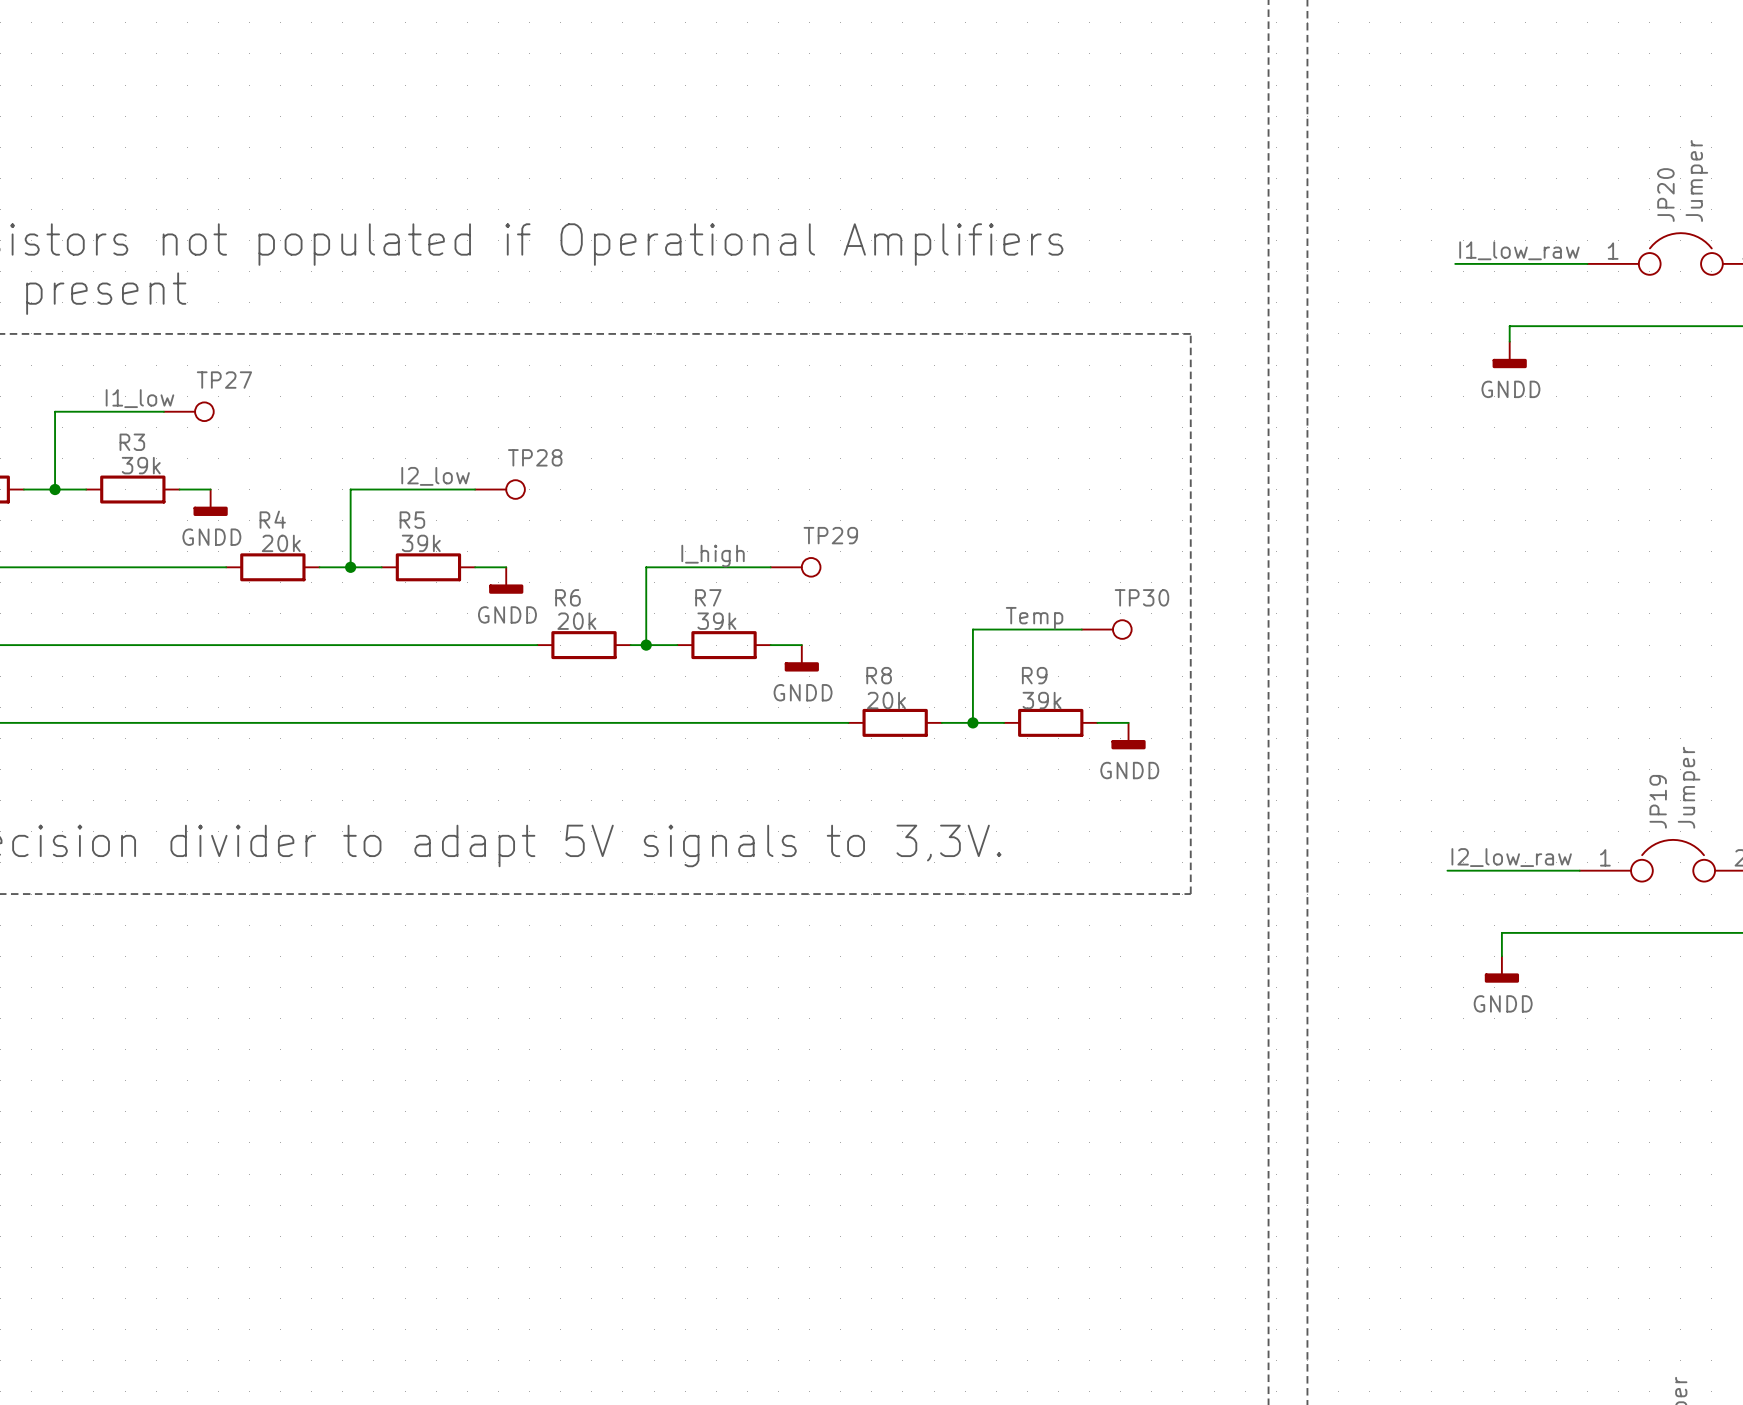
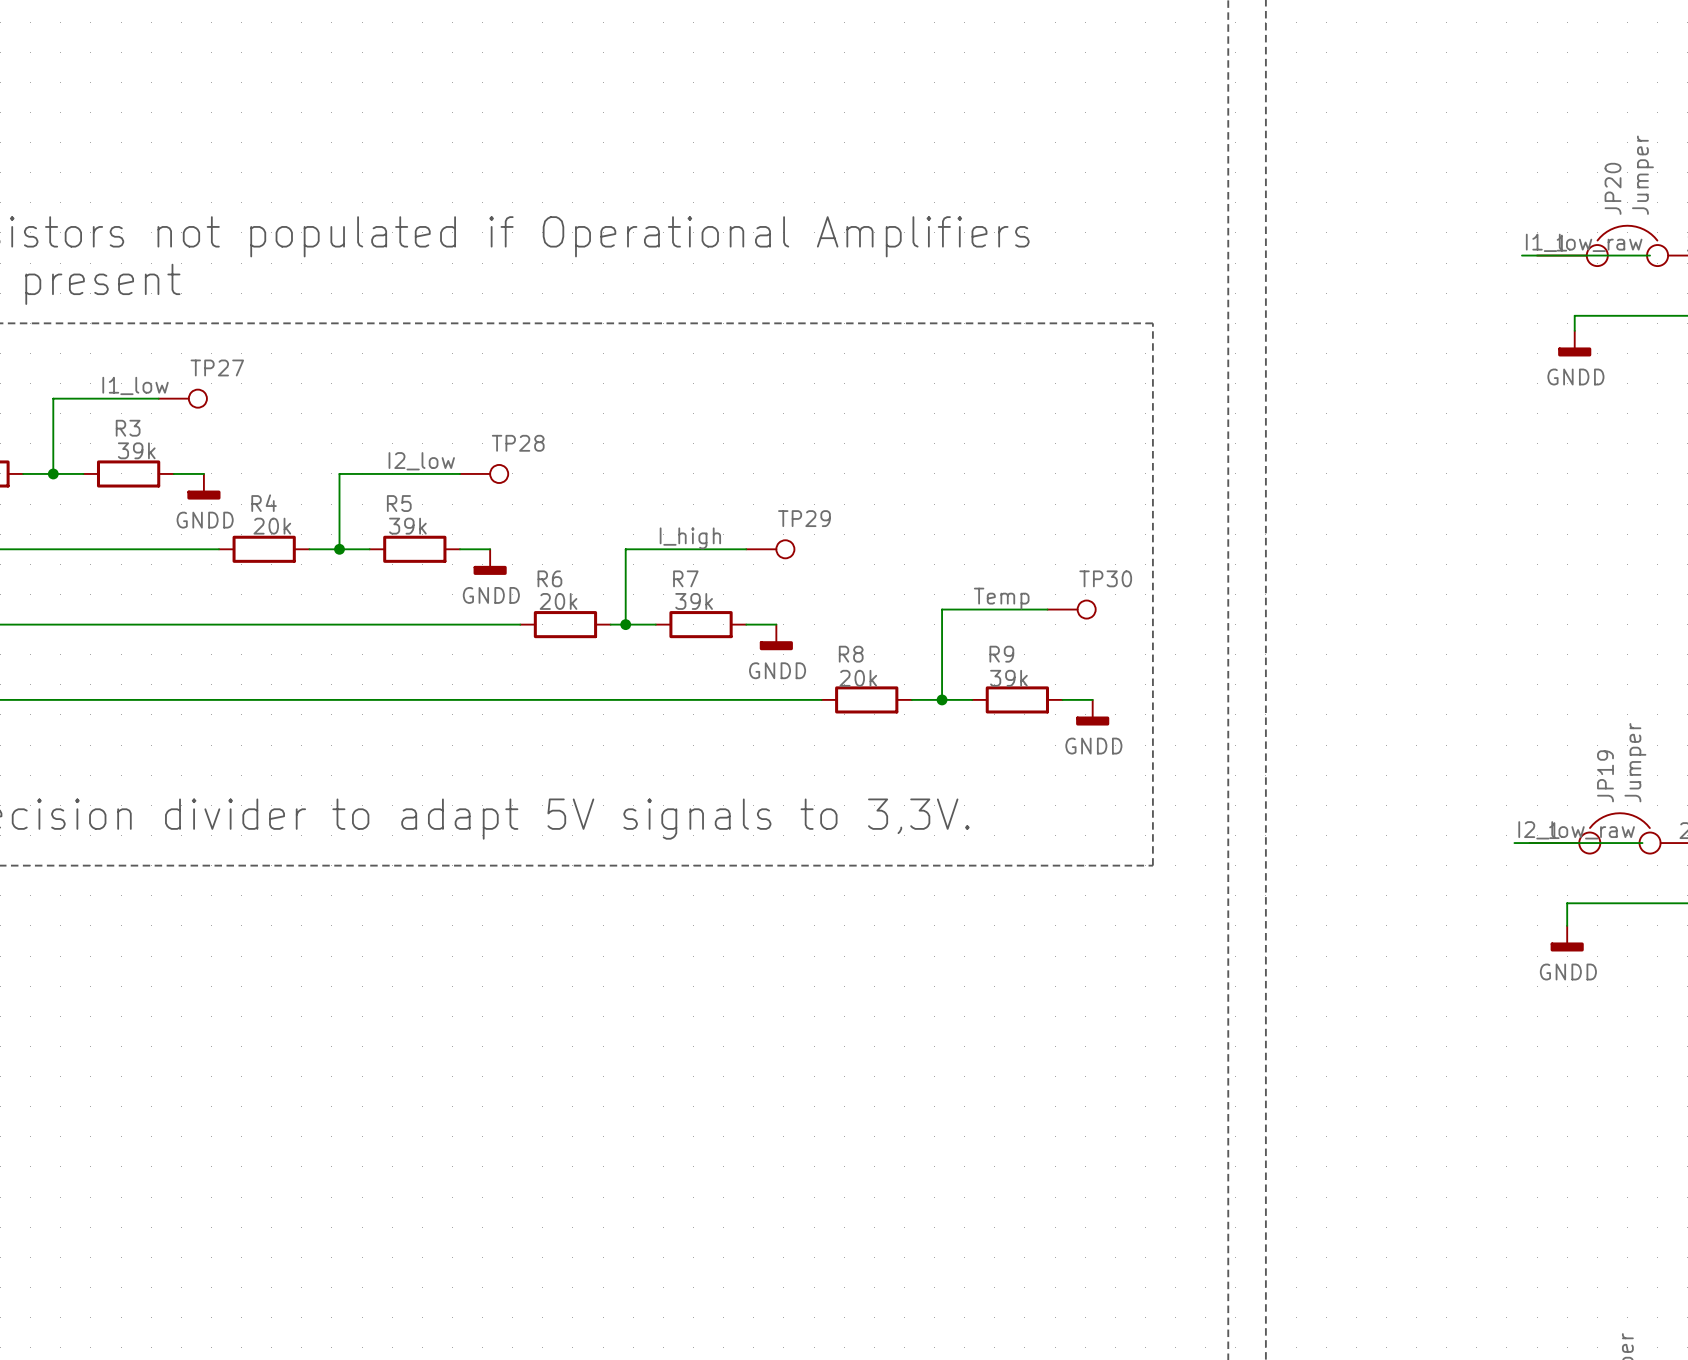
label position: I1_low_raw (1519, 250) -> I1_low_raw (1584, 242)
wire: (1455, 263) (1571, 263) -> (1537, 255) (1650, 255)
wire: (1626, 326) (1509, 326) (1509, 341) -> (1574, 315) (1574, 330)
power symbol position: GNDD (1509, 354) -> GNDD (1574, 343)
label position: I2_low_raw (1511, 857) -> I2_low_raw (1576, 830)
wire: (1447, 870) (1564, 870) -> (1529, 843) (1642, 843)
wire: (1618, 932) (1501, 932) (1501, 956) -> (1567, 903) (1567, 925)
power symbol position: GNDD (1501, 969) -> GNDD (1567, 938)

